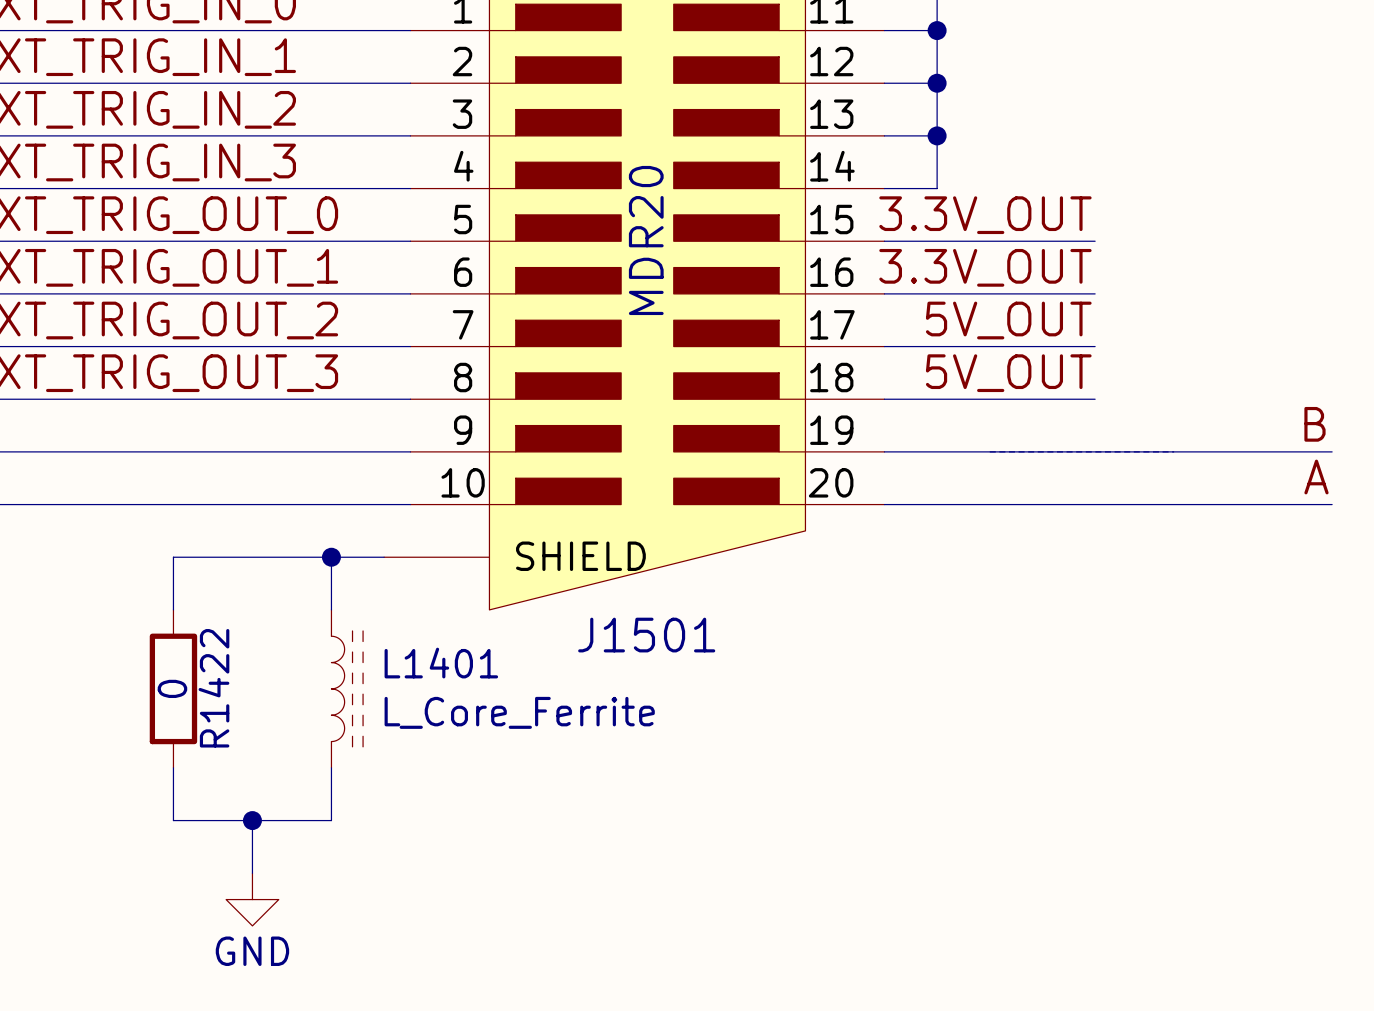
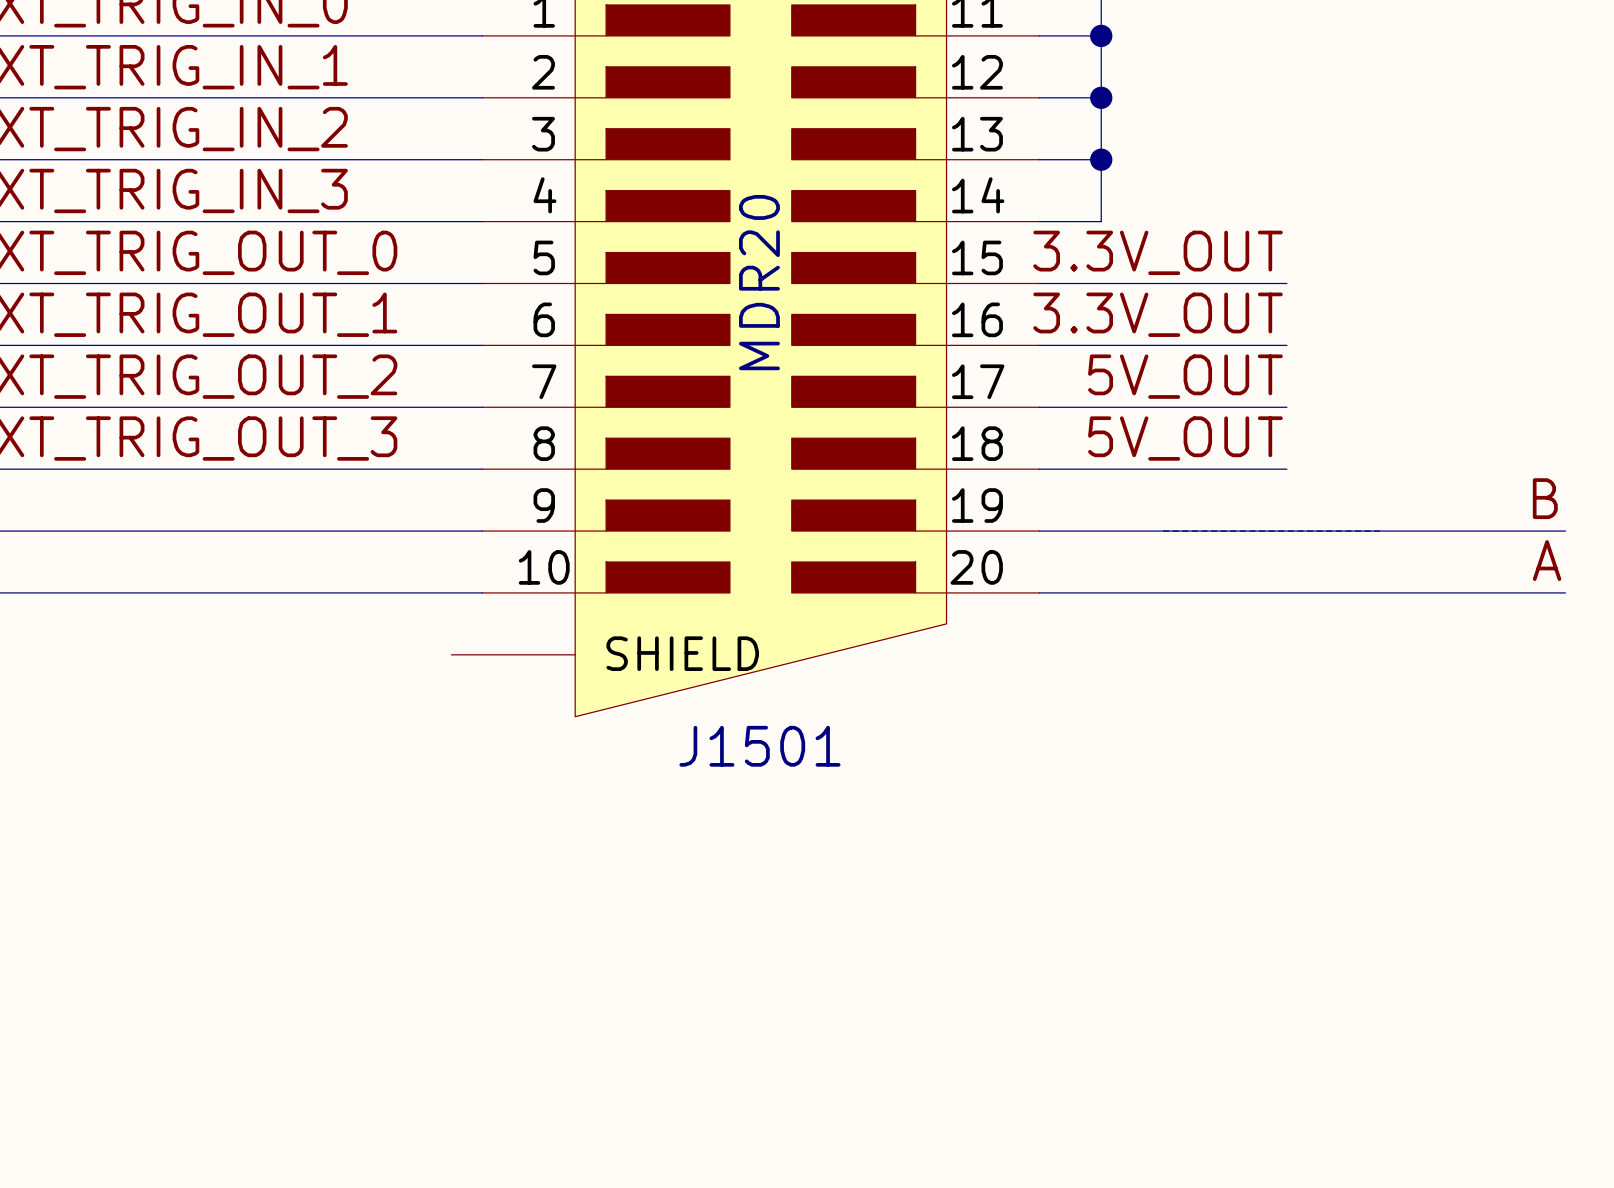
wire: (331, 557) (331, 609) -> none
junction: (331, 557) -> none
wire: (384, 557) (173, 557) (173, 609) -> none
R1422: 0 (173, 688) -> none
L1401: L_Core_Ferrite (347, 688) -> none
wire: (173, 767) (173, 820) (331, 820) (331, 767) -> none
wire: (252, 820) (252, 873) -> none
junction: (252, 820) -> none
power symbol: GND (252, 899) -> none

